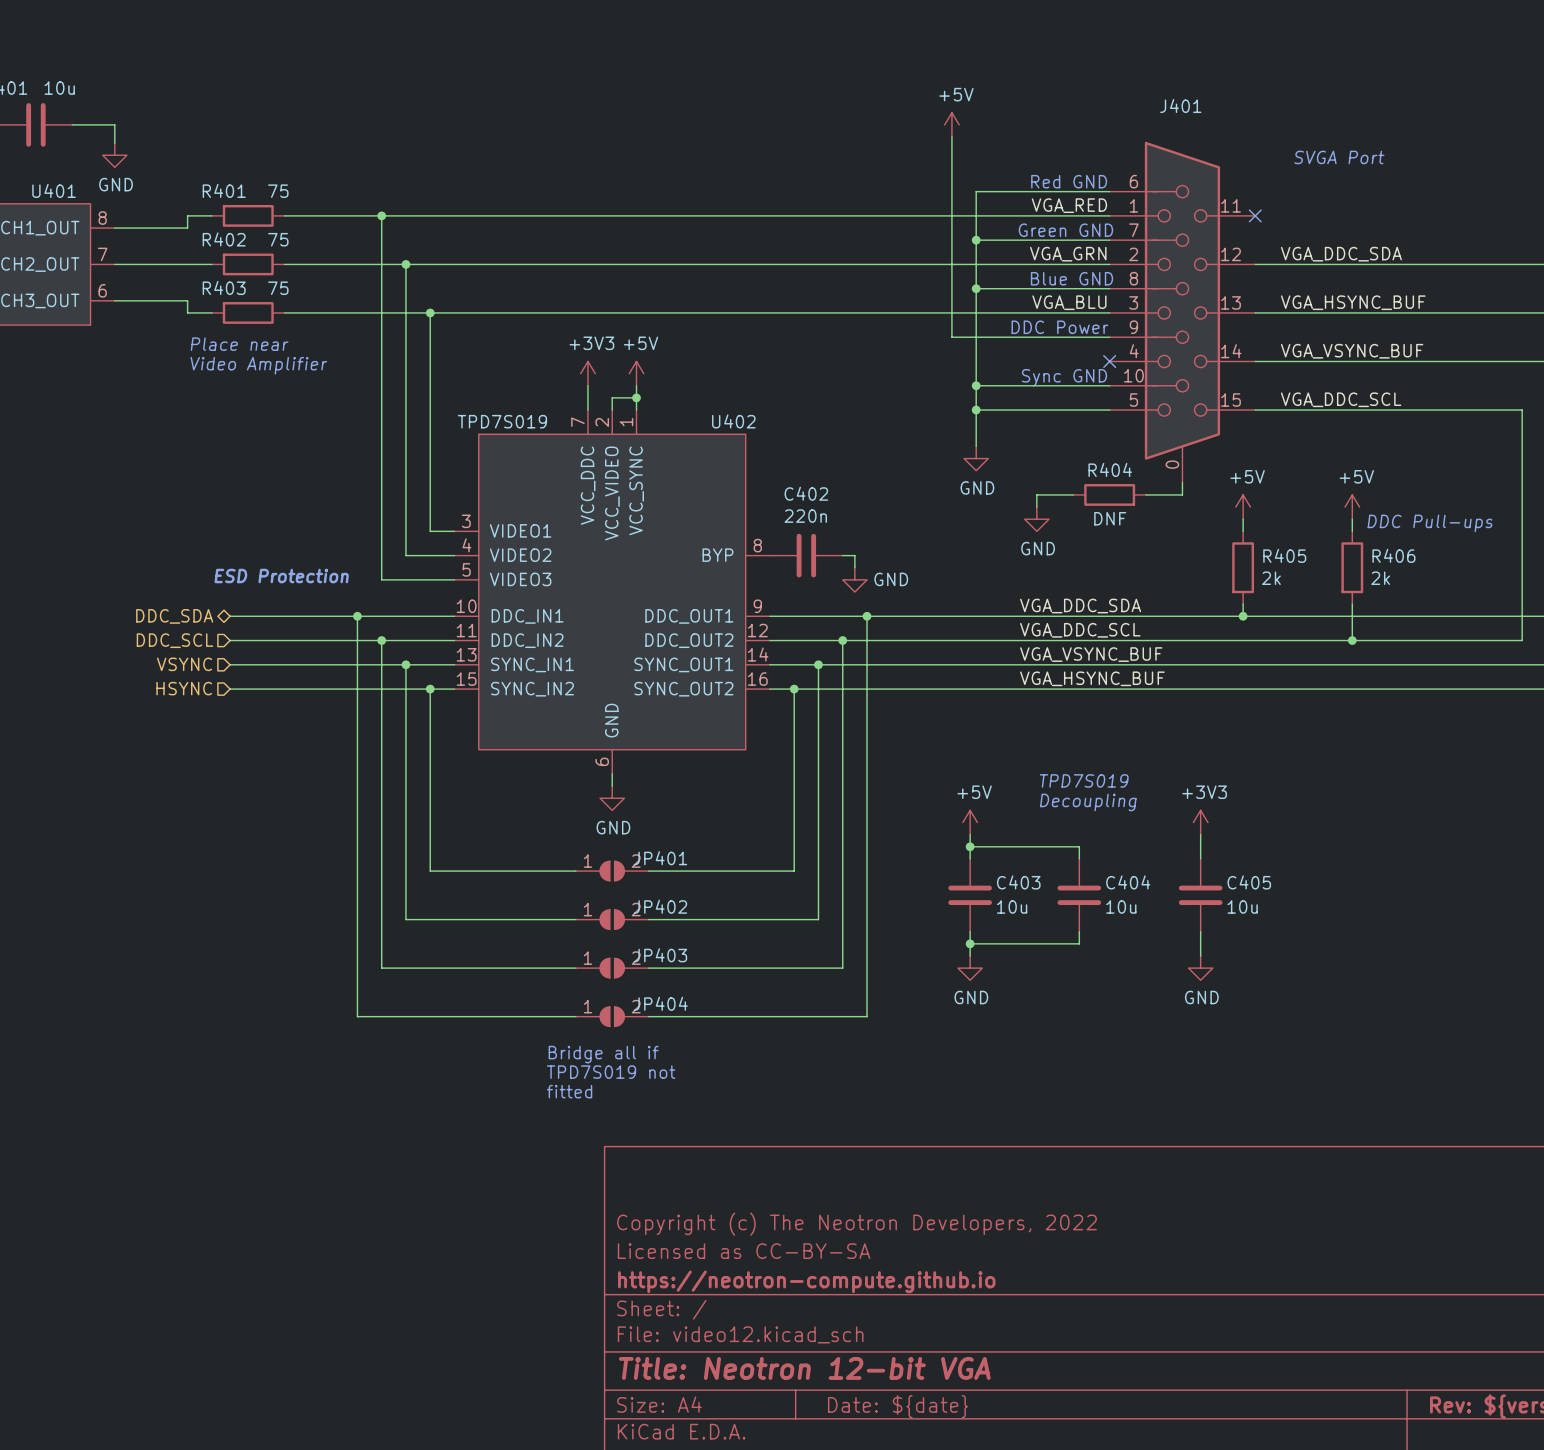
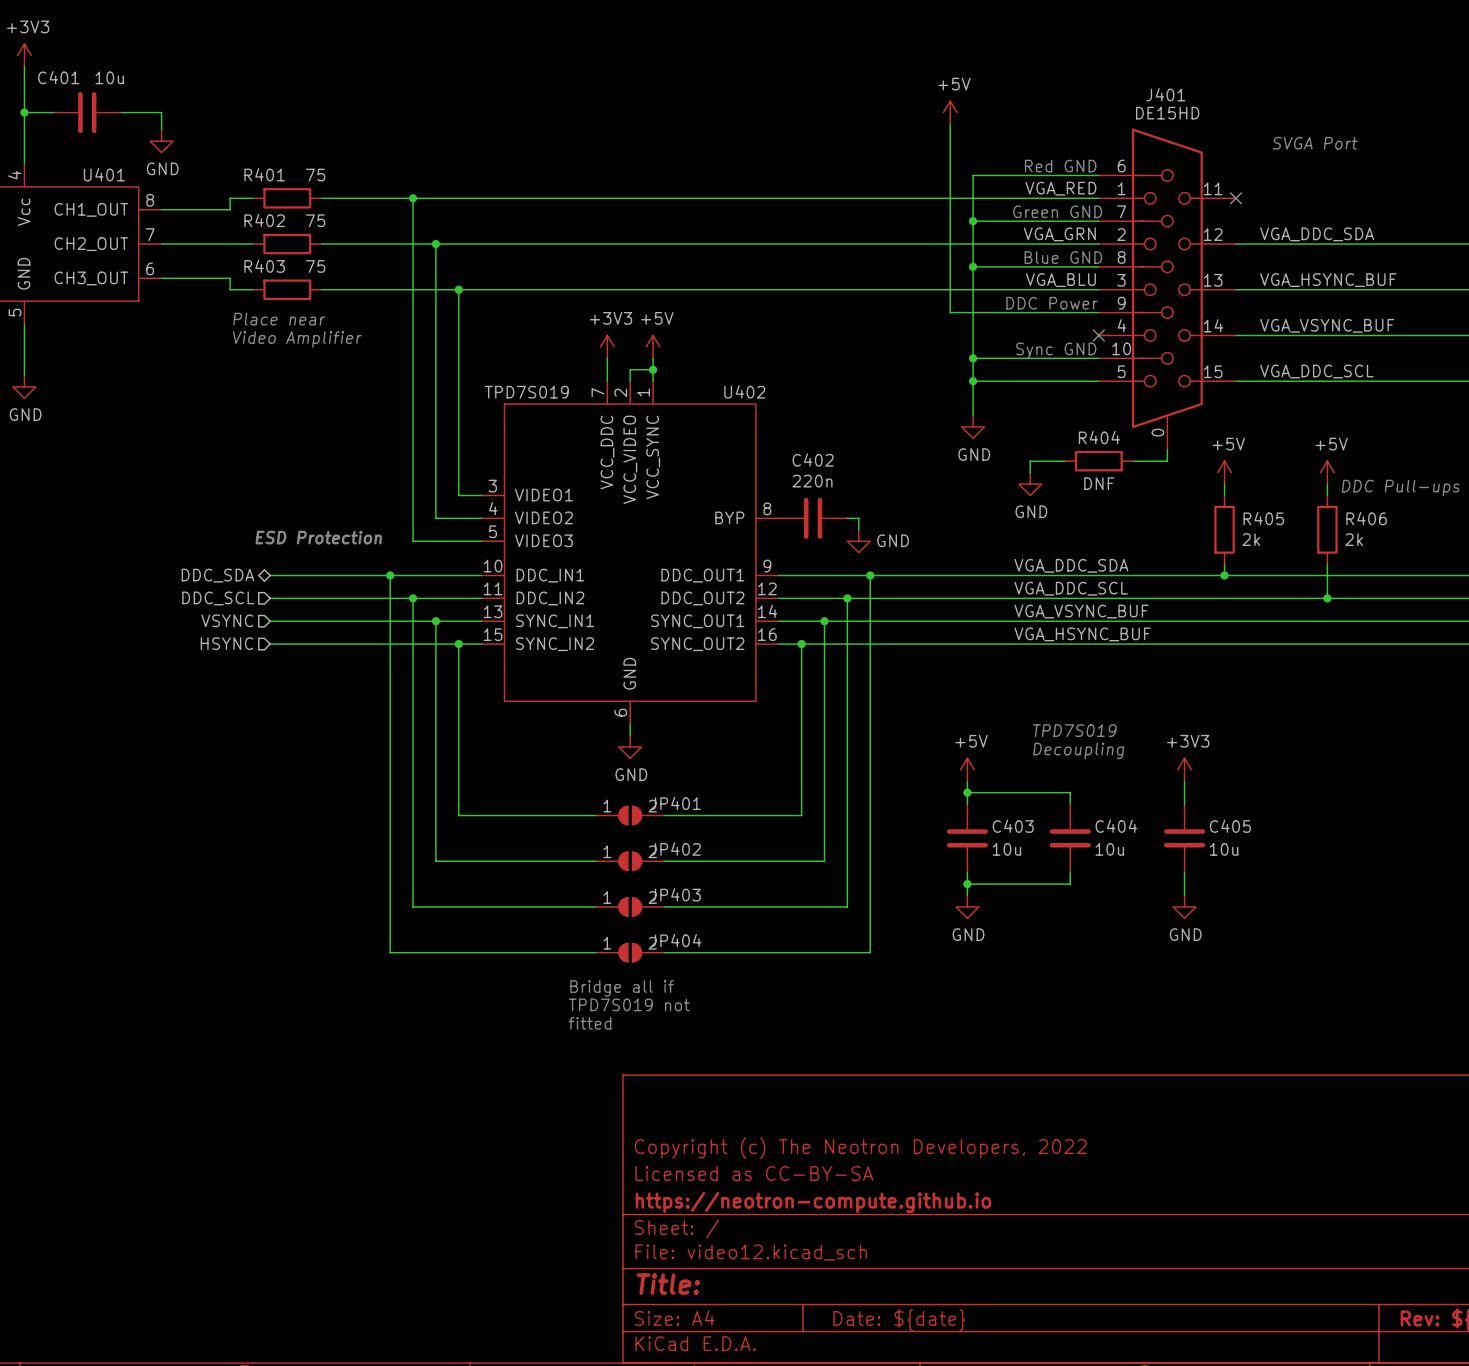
J401 value: none -> DE15HD (1167, 113)
title block: Title: Neotron 12-bit VGA (804, 1368) -> Title: (668, 1284)

